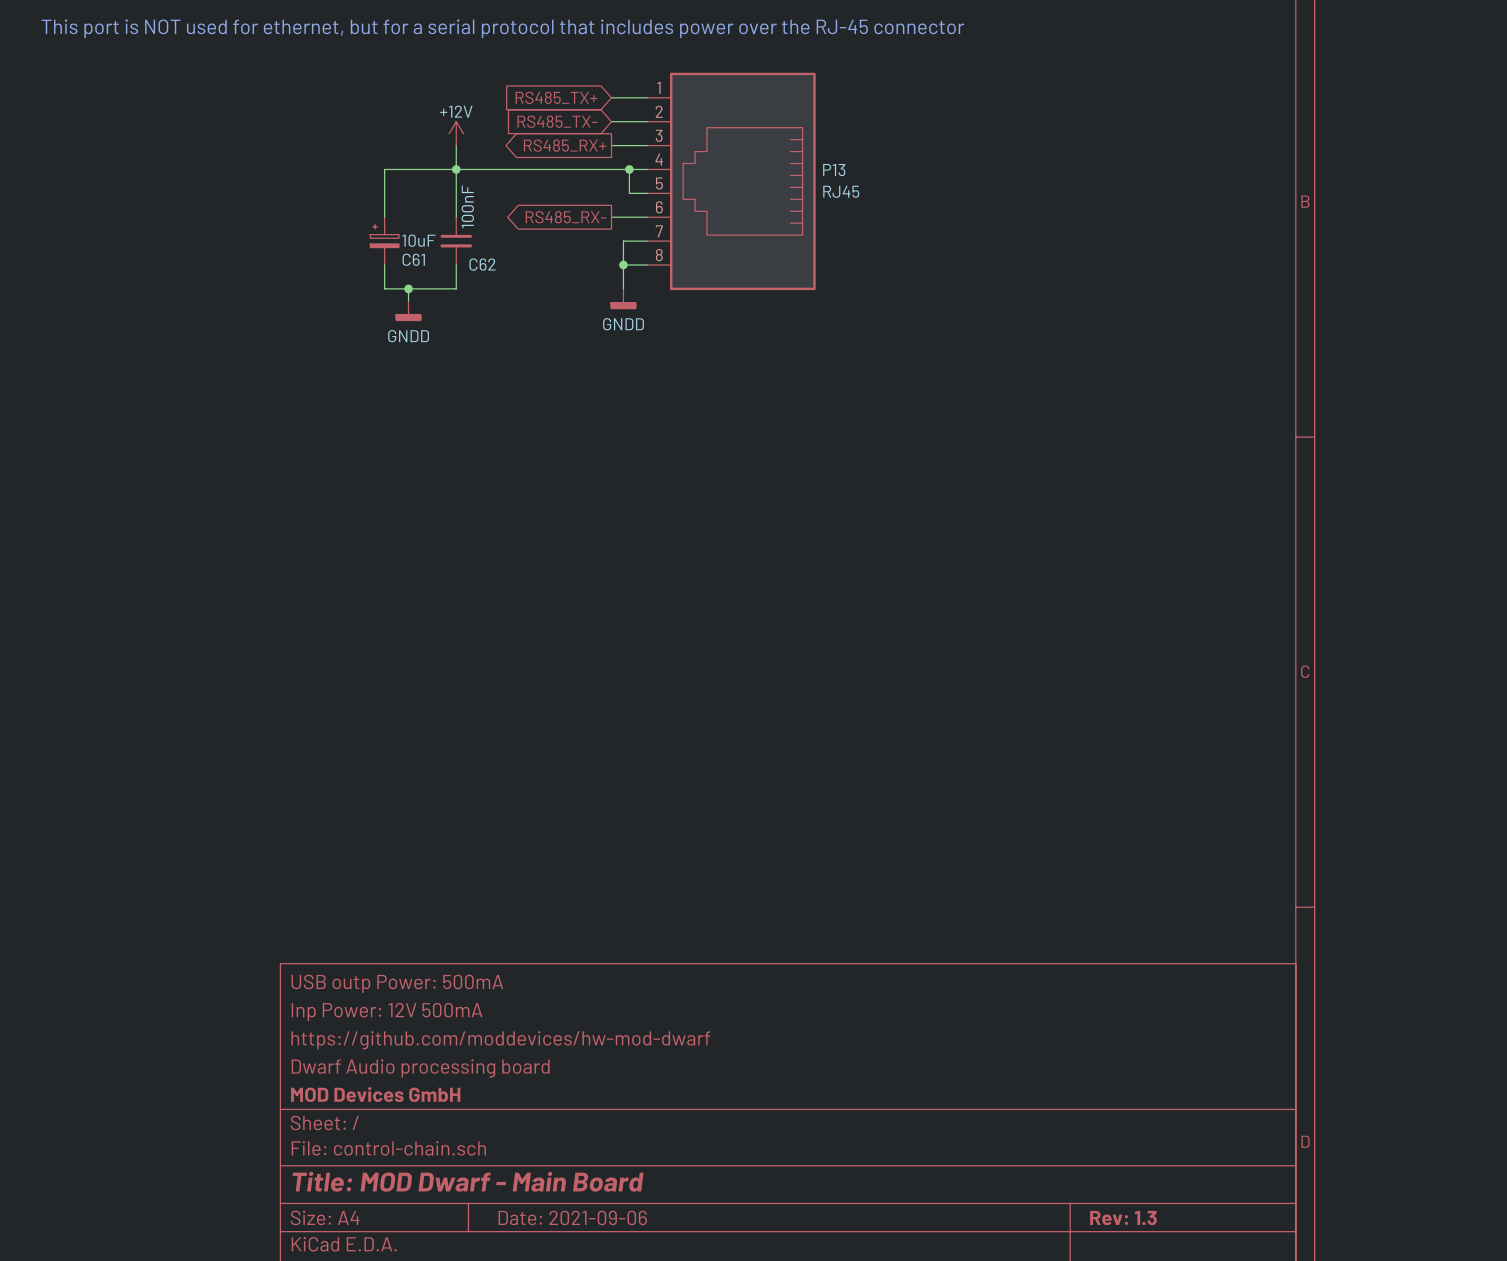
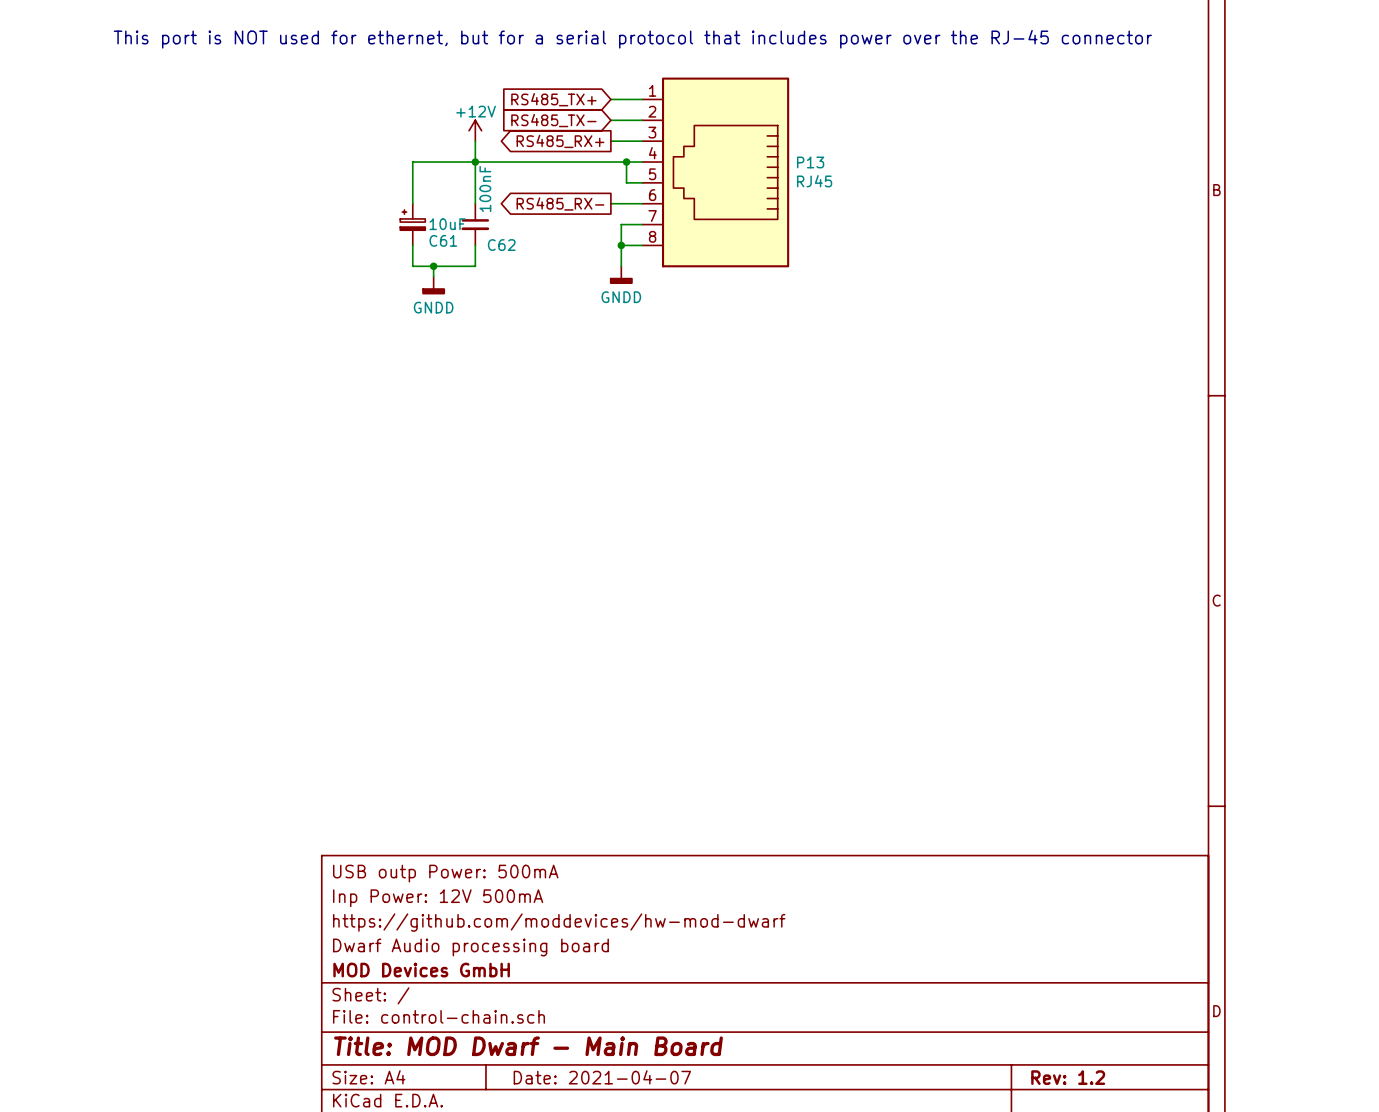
title block: Date: 2021-09-06 (572, 1217) -> Date: 2021-04-07 (602, 1077)
title block: Rev: 1.3 (1123, 1218) -> Rev: 1.2 (1068, 1077)

